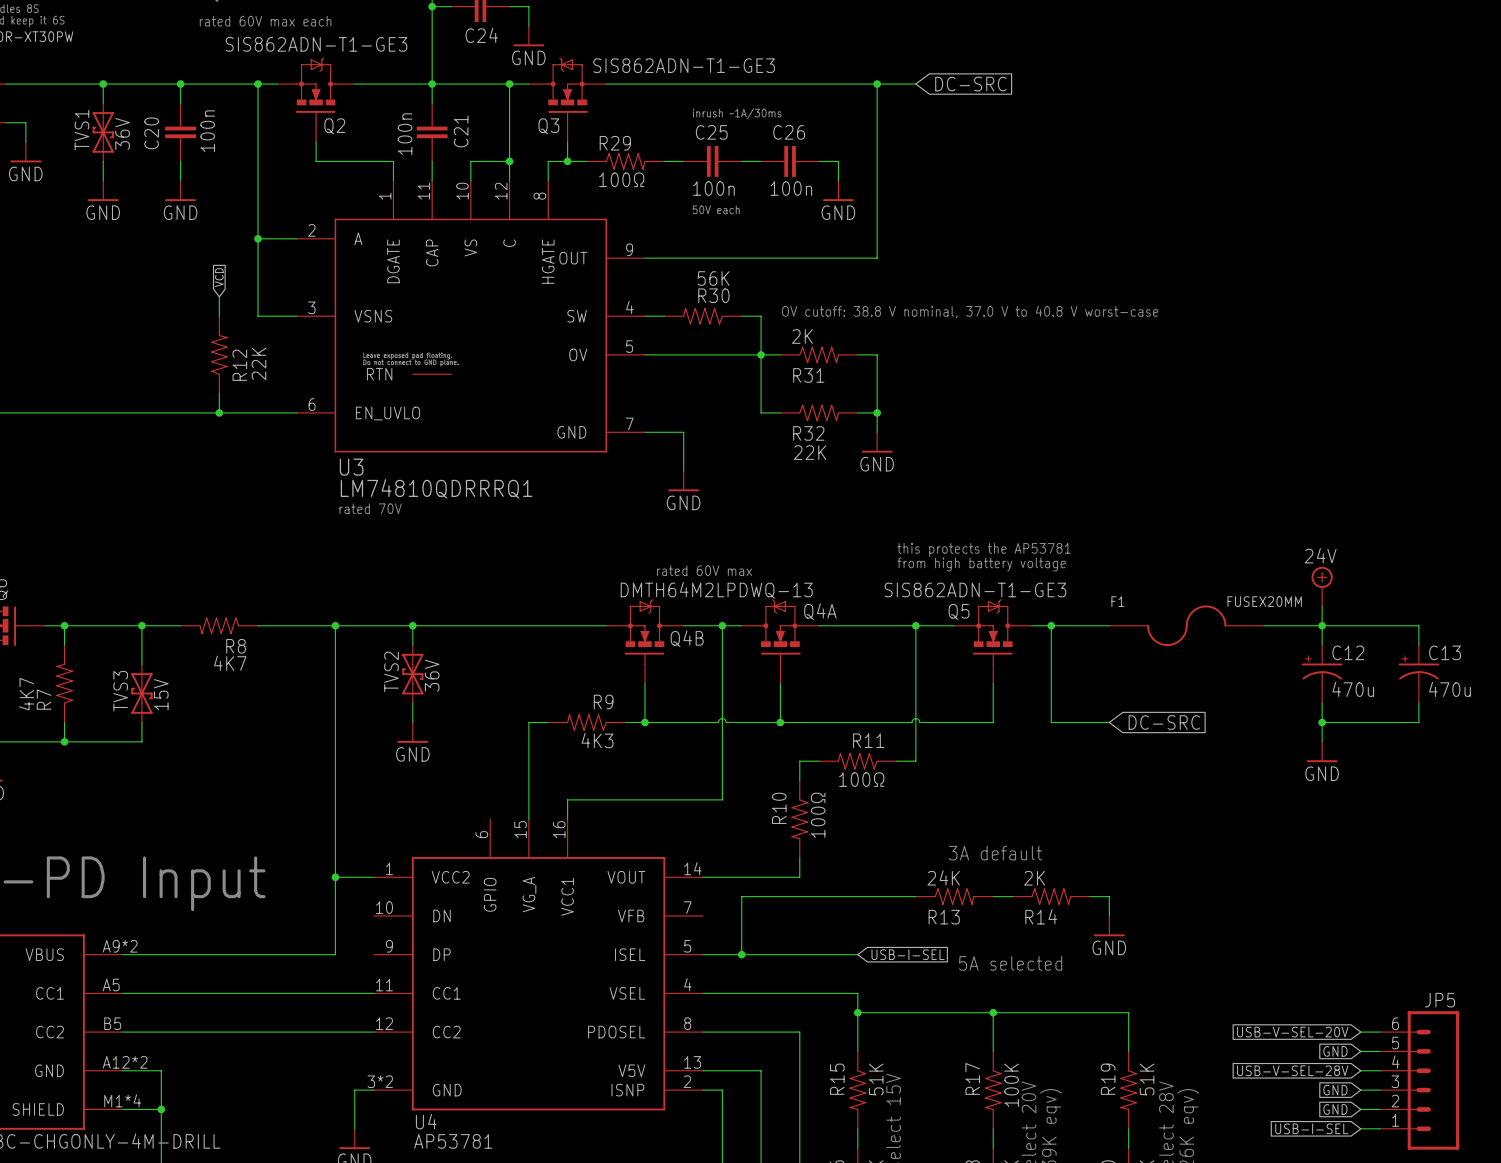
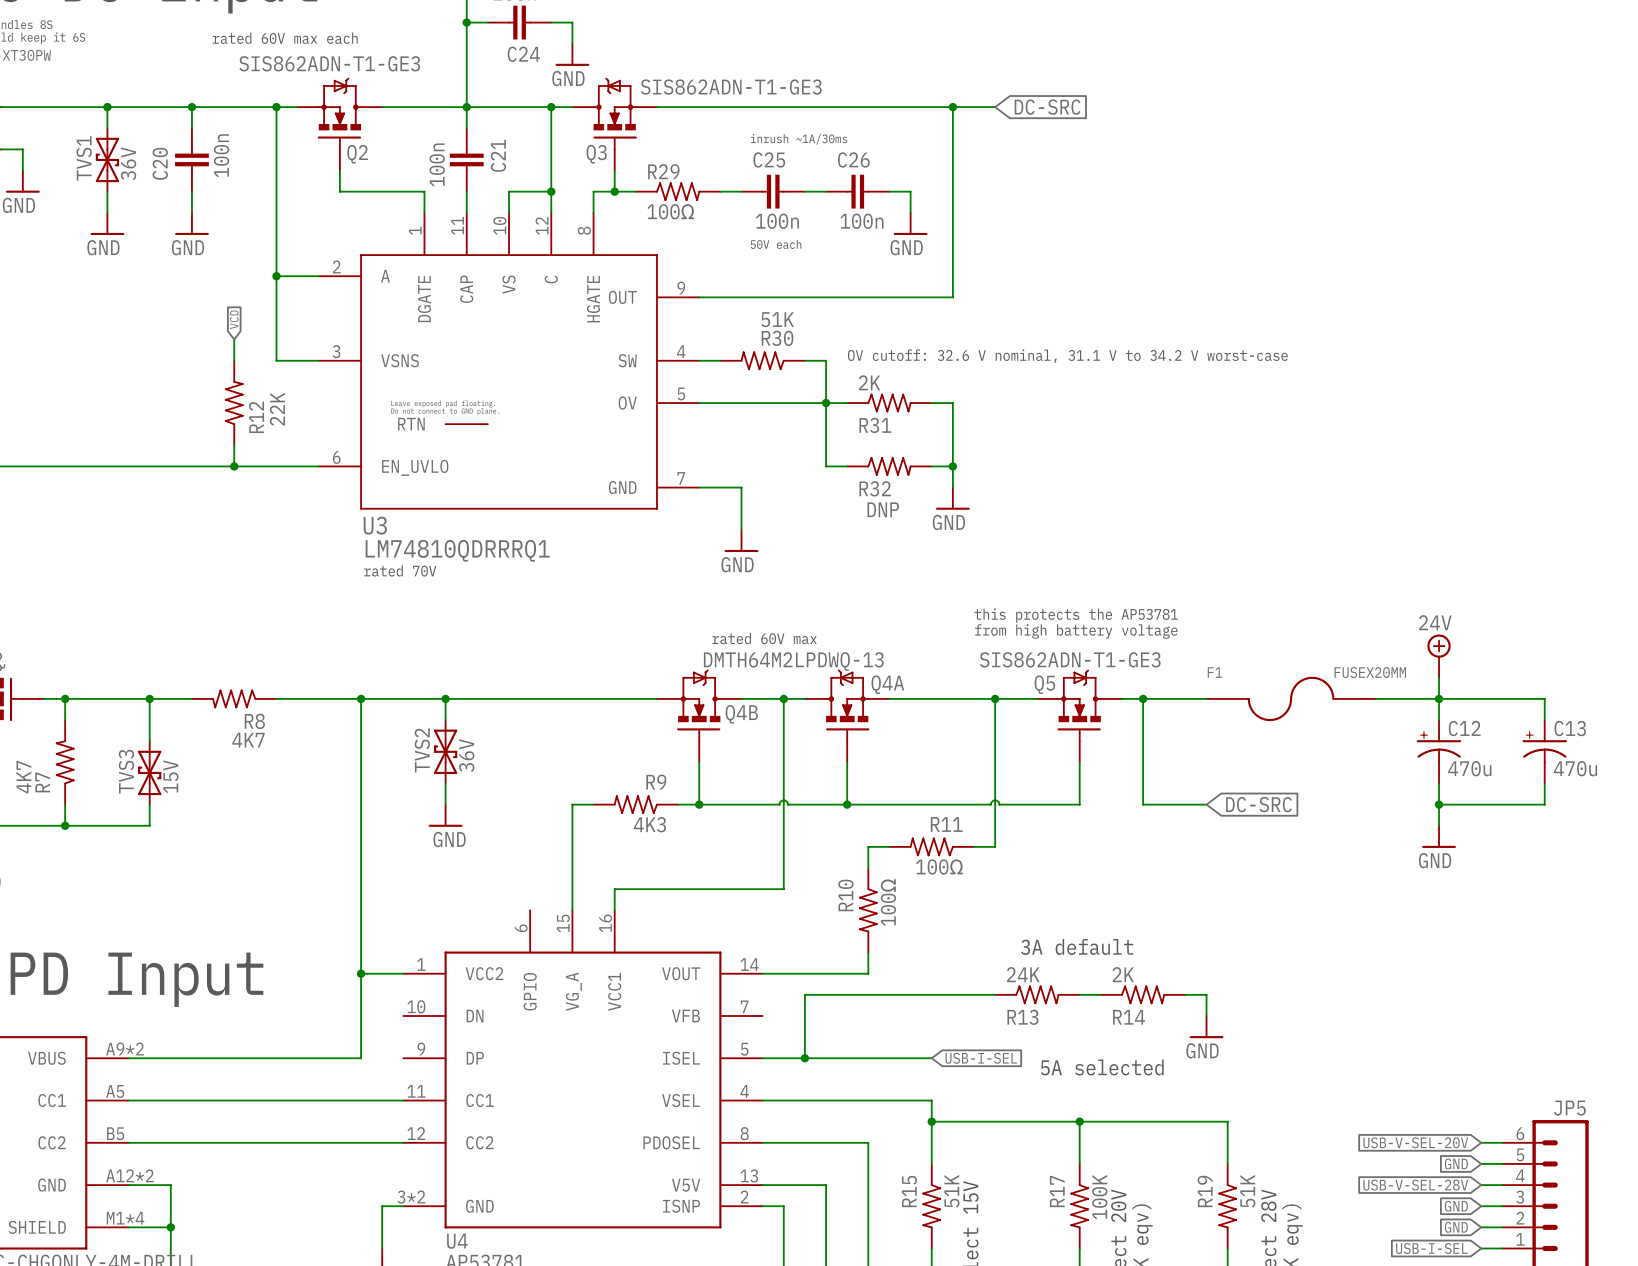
R30 value: 56K (713, 278) -> 51K (777, 319)
text: OV cutoff: 38.8 V nominal, 37.0 V to 40.8 V worst-case (970, 311) -> OV cutoff: 32.6 V nominal, 31.1 V to 34.2 V worst-case (1067, 356)
R32 value: 22K (810, 452) -> DNP (883, 509)

